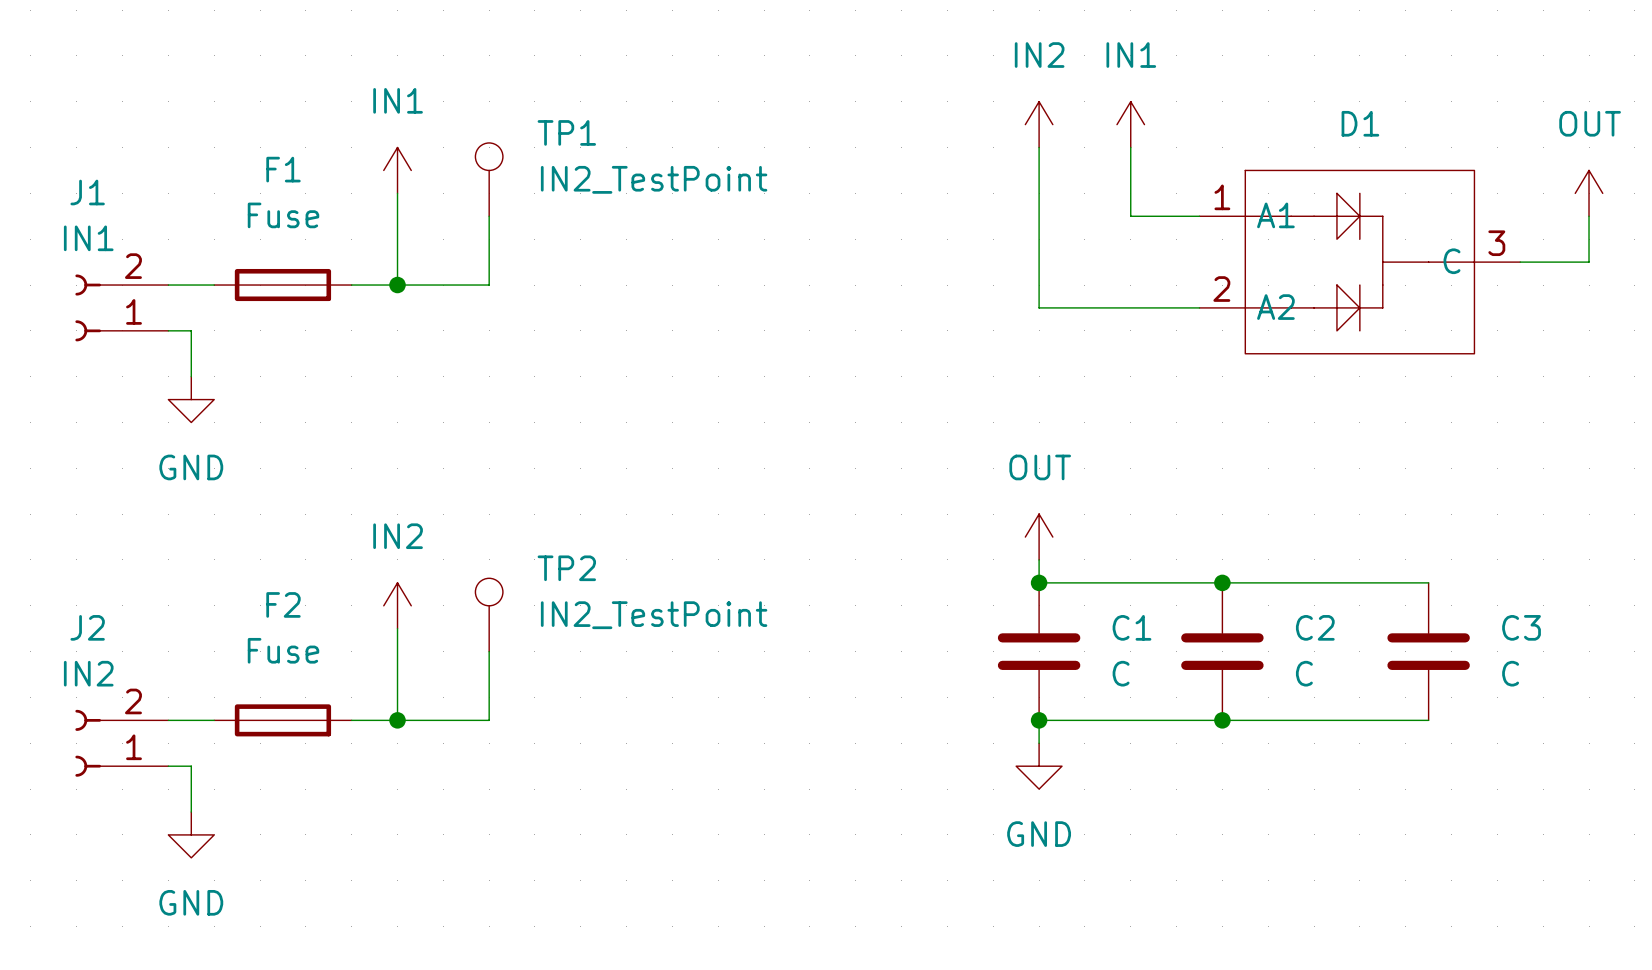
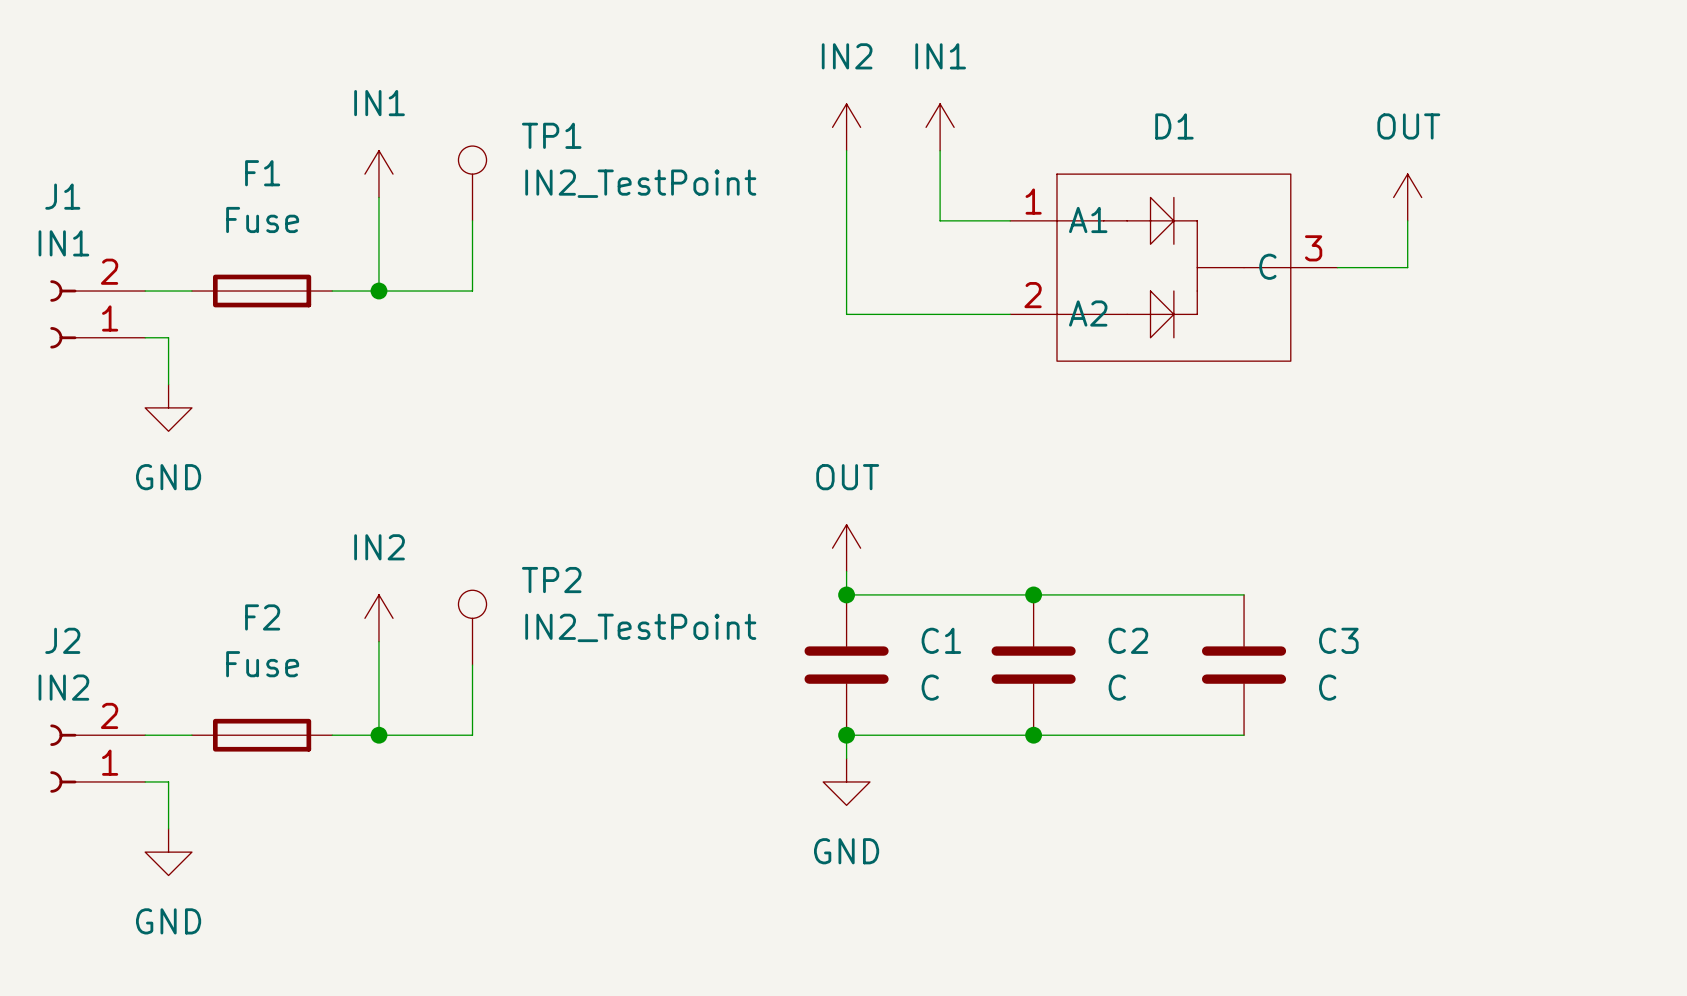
power symbol position: IN2 (1039, 124) -> IN2 (846, 127)
power symbol position: IN1 (1130, 124) -> IN1 (940, 127)
wire: (1039, 147) (1039, 307) (1199, 307) -> (846, 150) (846, 314) (1010, 314)
wire: (1130, 147) (1130, 216) (1199, 216) -> (940, 150) (940, 220) (1010, 220)
power symbol position: OUT (1589, 193) -> OUT (1407, 197)
wire: (1589, 216) (1589, 262) (1520, 262) -> (1407, 220) (1407, 267) (1337, 267)
D1 position: (1359, 262) -> (1173, 267)
power symbol position: OUT (1039, 537) -> OUT (846, 548)
wire: (1039, 559) (1039, 582) -> (846, 571) (846, 594) (1033, 594)
junction: none -> (846, 594)
junction: (1222, 582) -> none
wire: (1245, 582) (1428, 582) -> none
C1 name: C1 (1132, 627) -> C2 (1128, 640)
C1: none -> C (846, 665)
C2: C (1222, 651) -> none
C3 position: (1428, 651) -> (1244, 665)
junction: none -> (846, 735)
wire: (1039, 720) (1039, 743) -> (1033, 735) (846, 735) (846, 758)
junction: (1222, 720) -> none
wire: (1245, 720) (1428, 720) -> none
power symbol position: GND (1039, 766) -> GND (846, 781)

